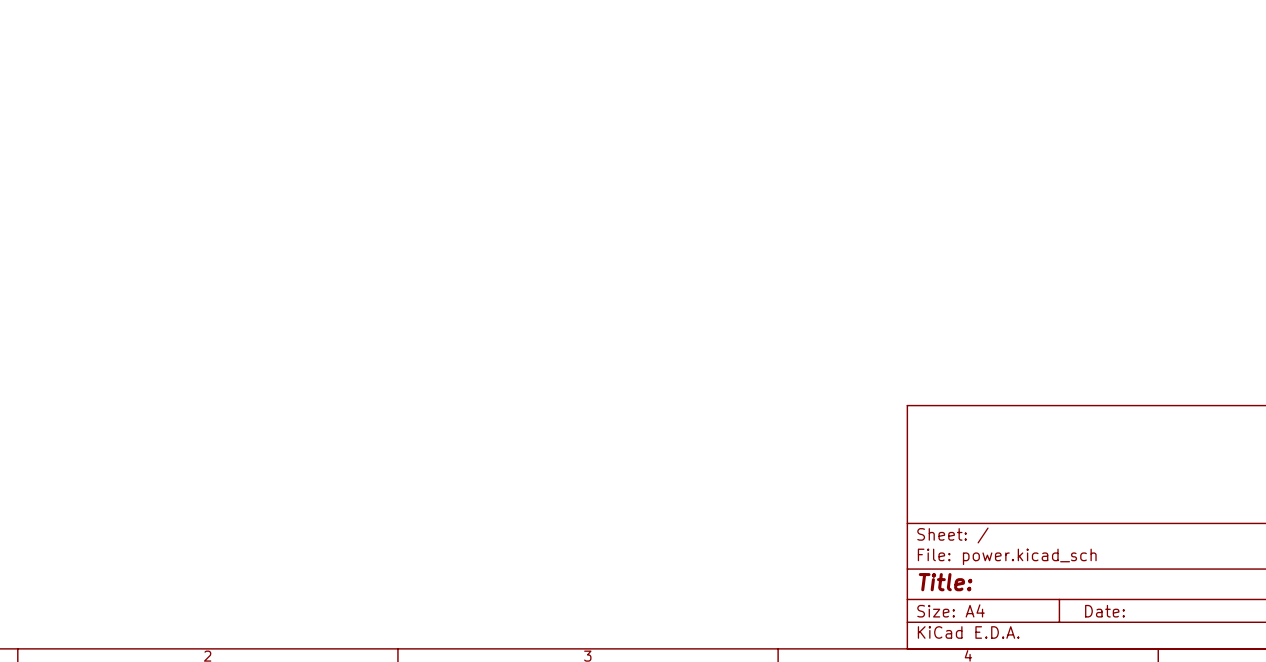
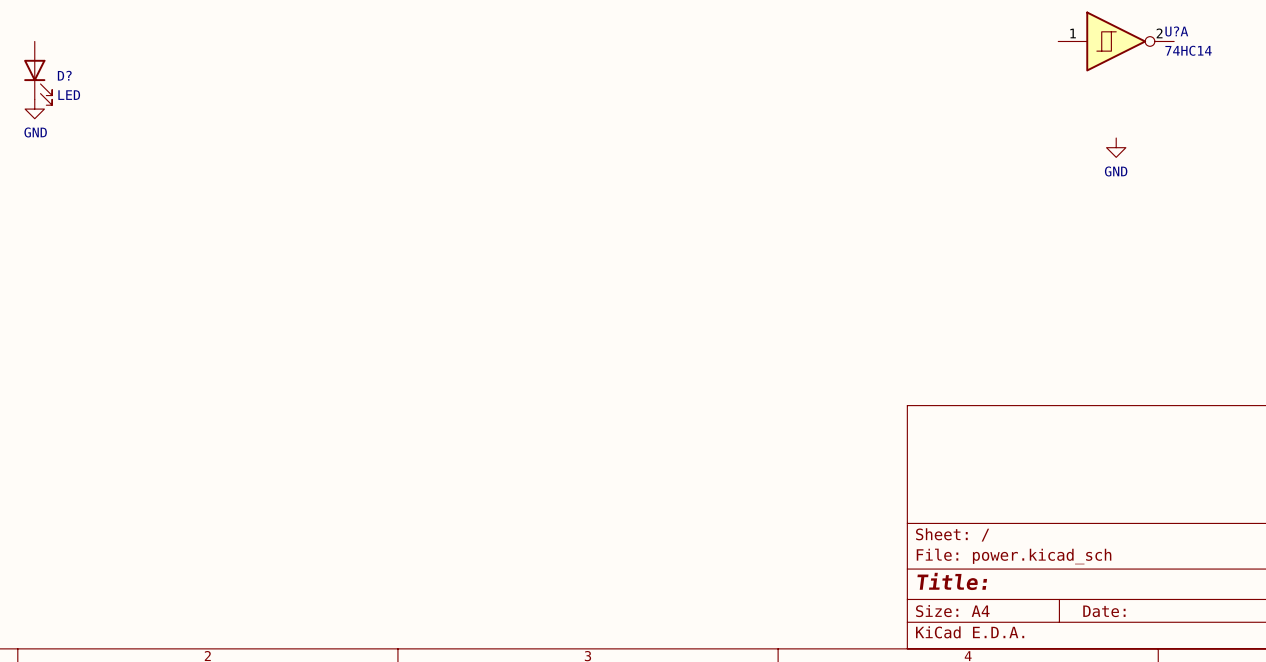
U?A: none -> 74HC14 (1116, 41)
D?: none -> LED (38, 73)
power symbol: none -> GND (34, 109)
power symbol: none -> GND (1116, 147)

